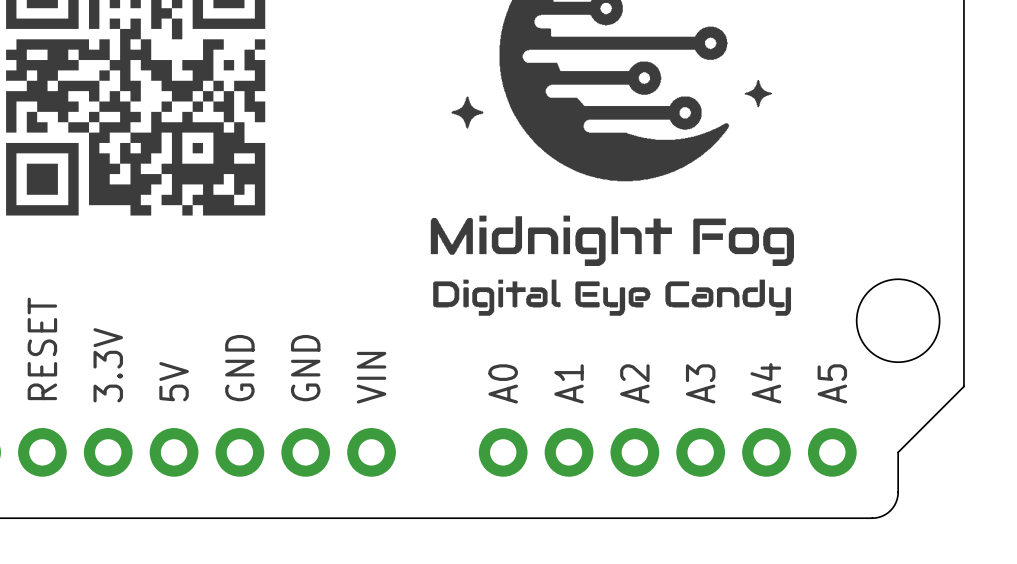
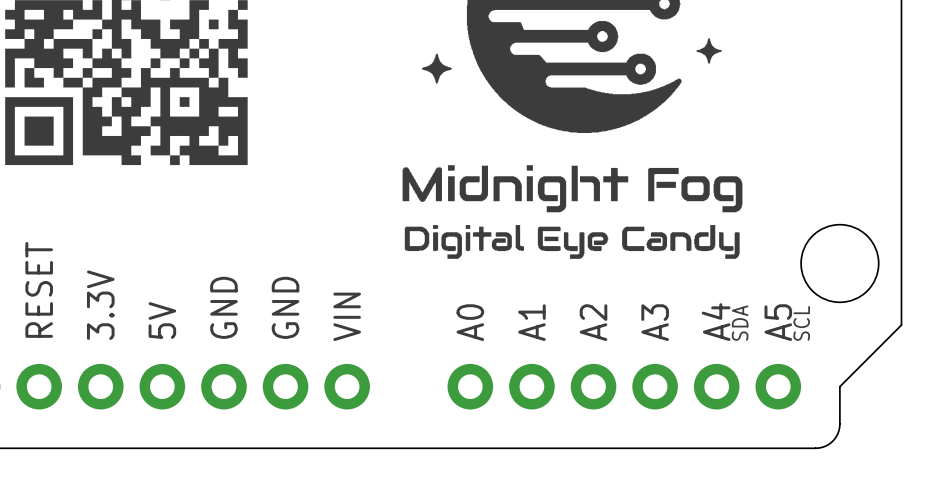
text: none -> SDA (740, 323)
text: none -> SCL (801, 323)

